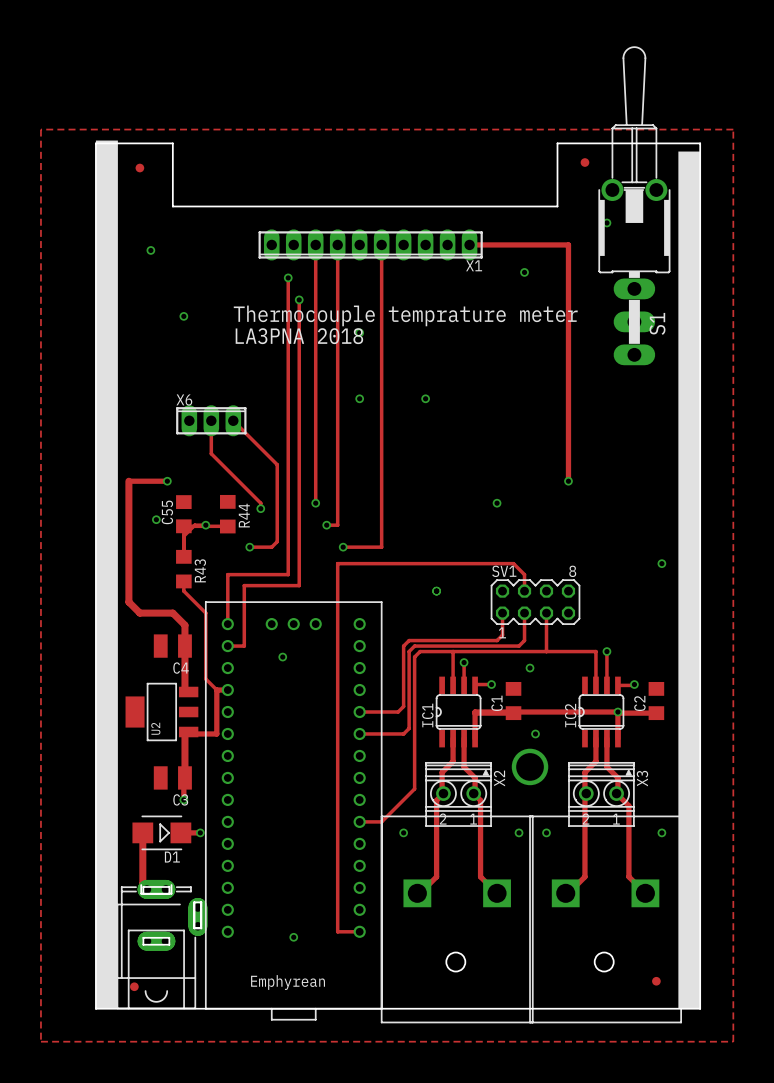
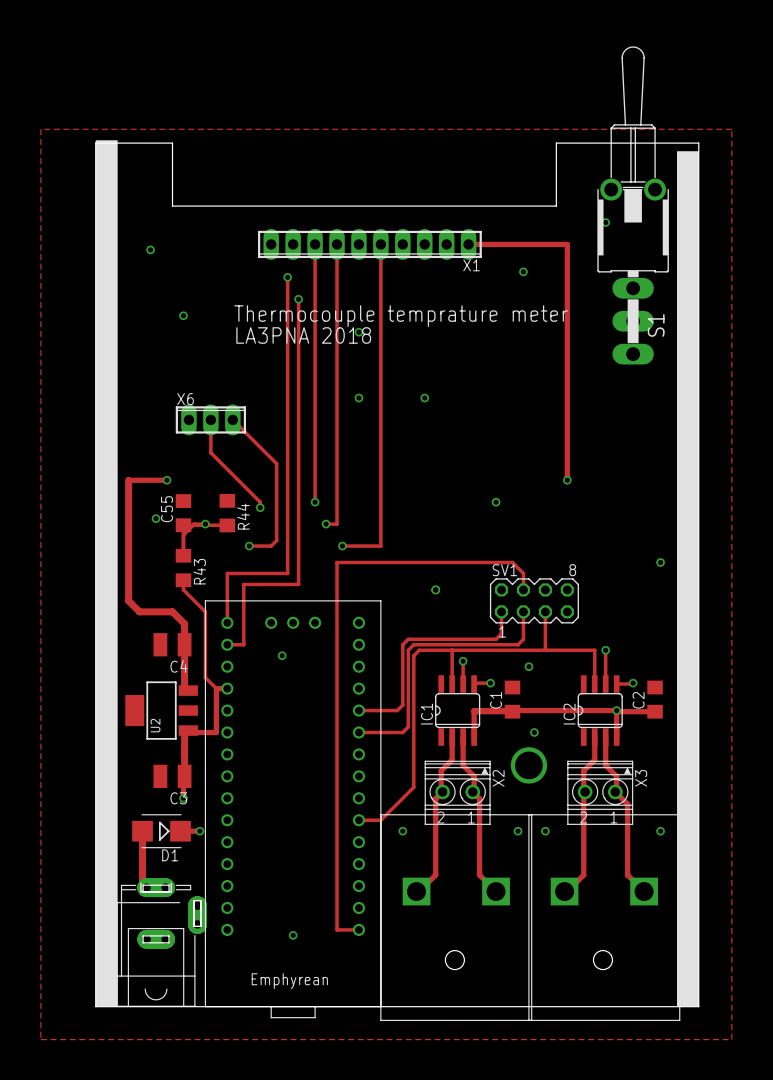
part: (584, 162) -> none
part: (139, 168) -> none
part: (656, 981) -> none
part: (134, 986) -> none

